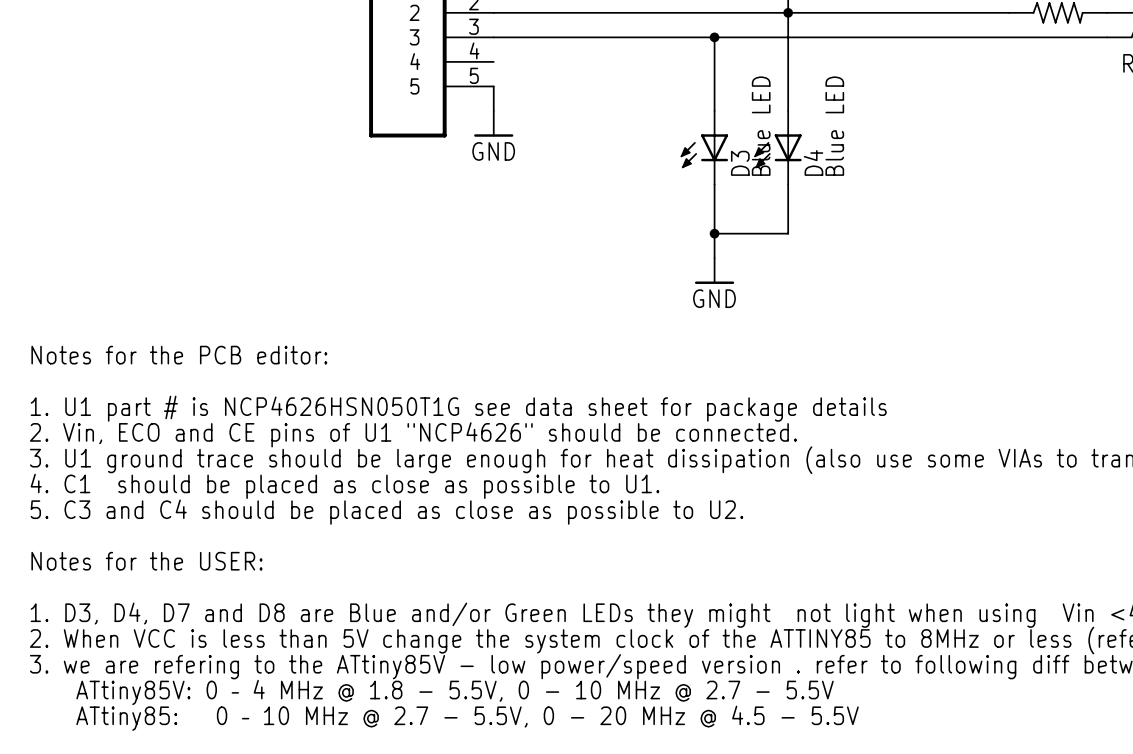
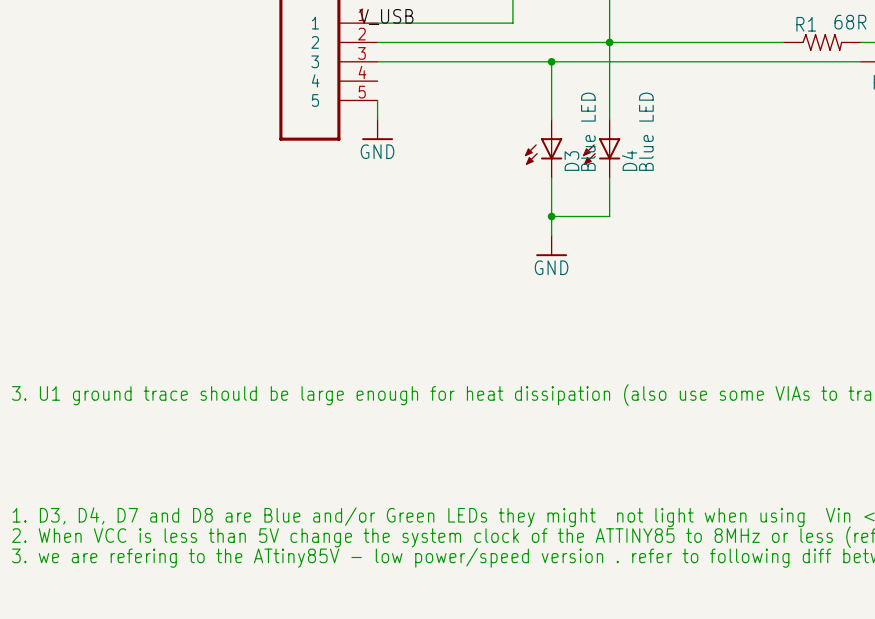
text: Notes for the PCB editor: (179, 355) -> none
text: 1. U1 part # is NCP4626HSN050T1G see data sheet for package details (458, 408) -> none
text: 2. Vin, ECO and CE pins of U1 "NCP4626" should be connected. (413, 434) -> none
text: 4. C1 should be placed as close as possible to U1. (344, 486) -> none
text: 5. C3 and C4 should be placed as close as possible to U2. (386, 512) -> none
text: Notes for the USER: (146, 561) -> none
text: ATtiny85V: 0 – 4 MHz @ 1.8 - 5.5V, 0 - 10 MHz @ 2.7 - 5.5V (455, 692) -> none
text: ATtiny85: 0 – 10 MHz @ 2.7 - 5.5V, 0 - 20 MHz @ 4.5 - 5.5V (467, 718) -> none

